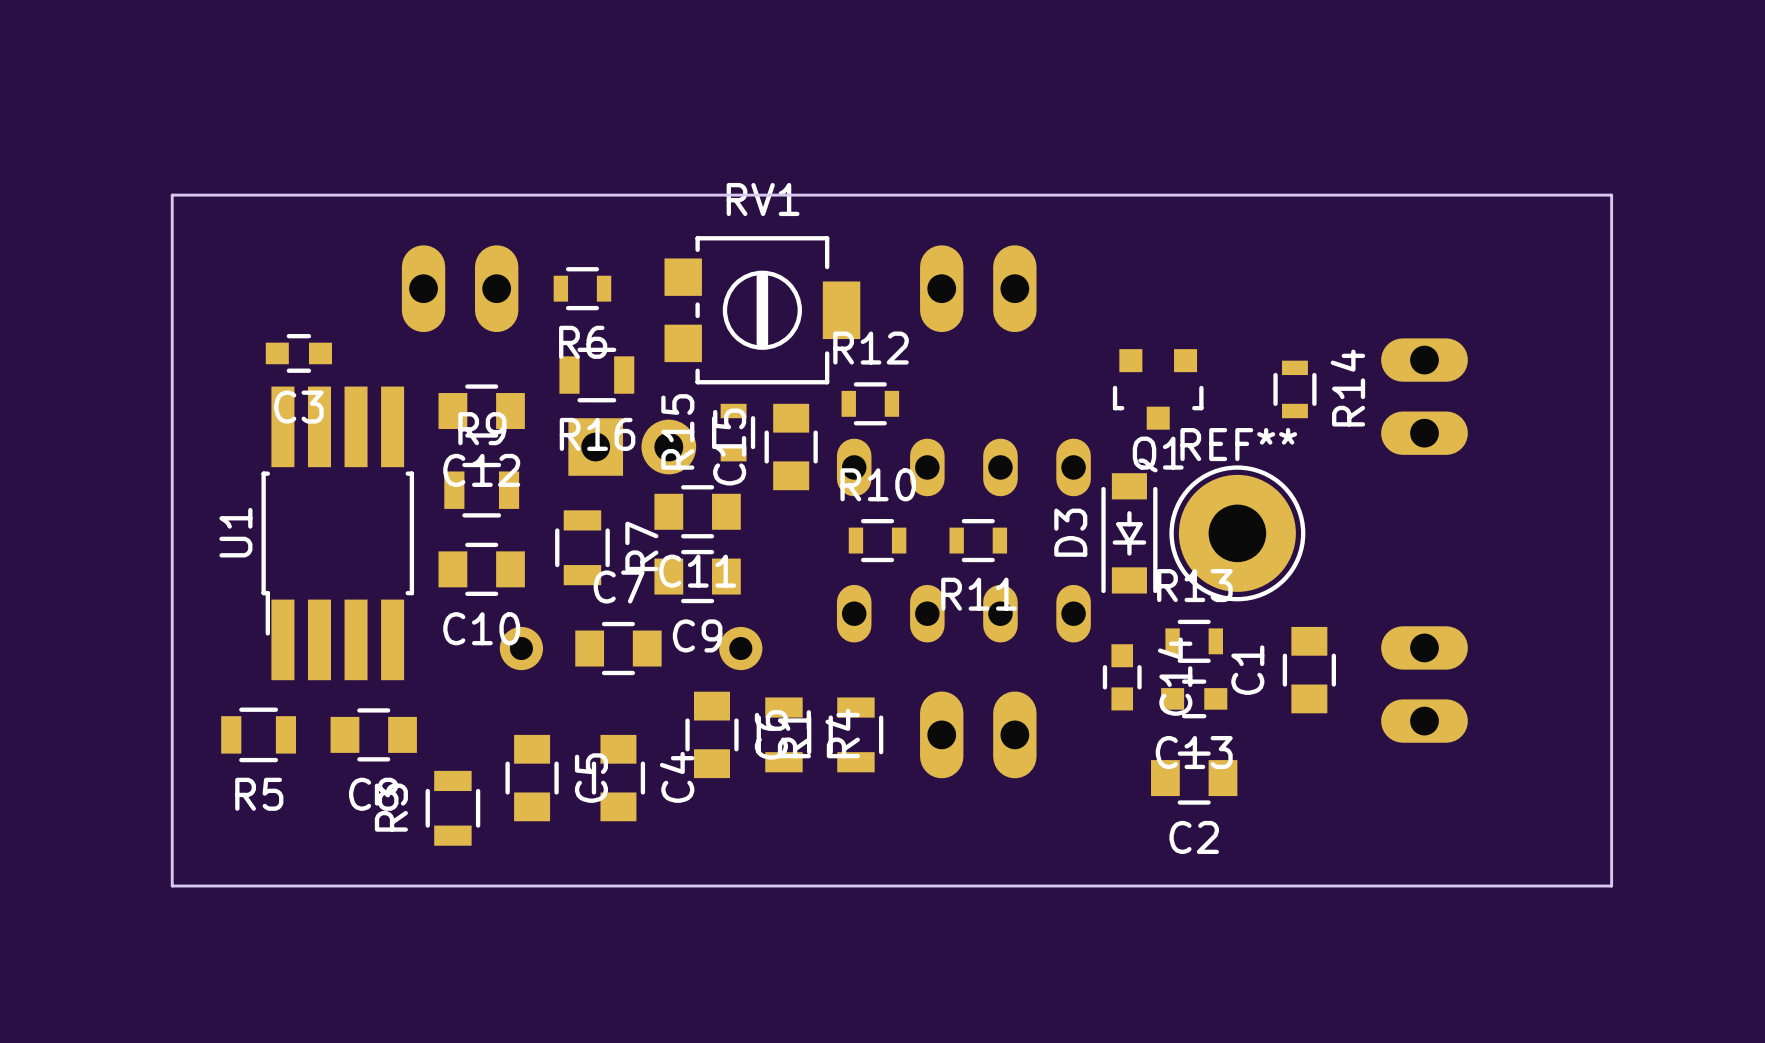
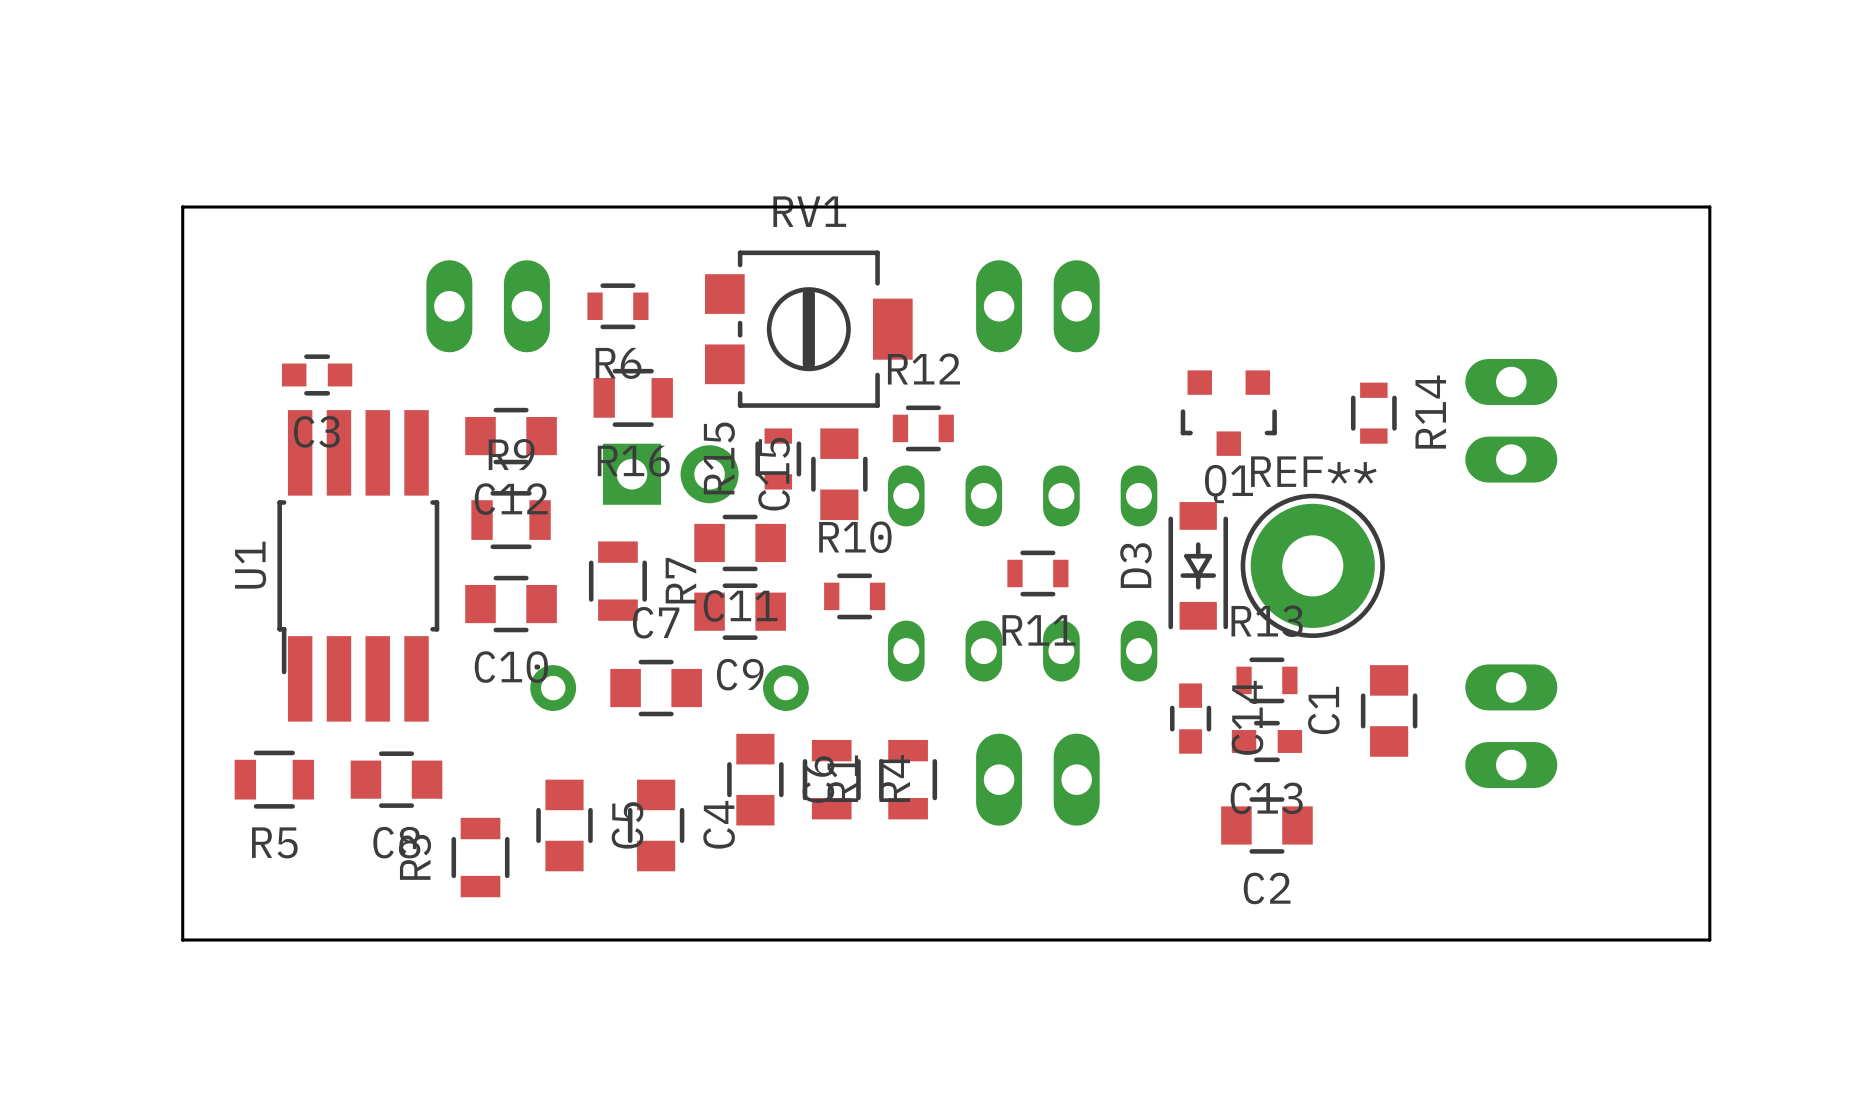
R10 position: (877, 540) -> (854, 596)

